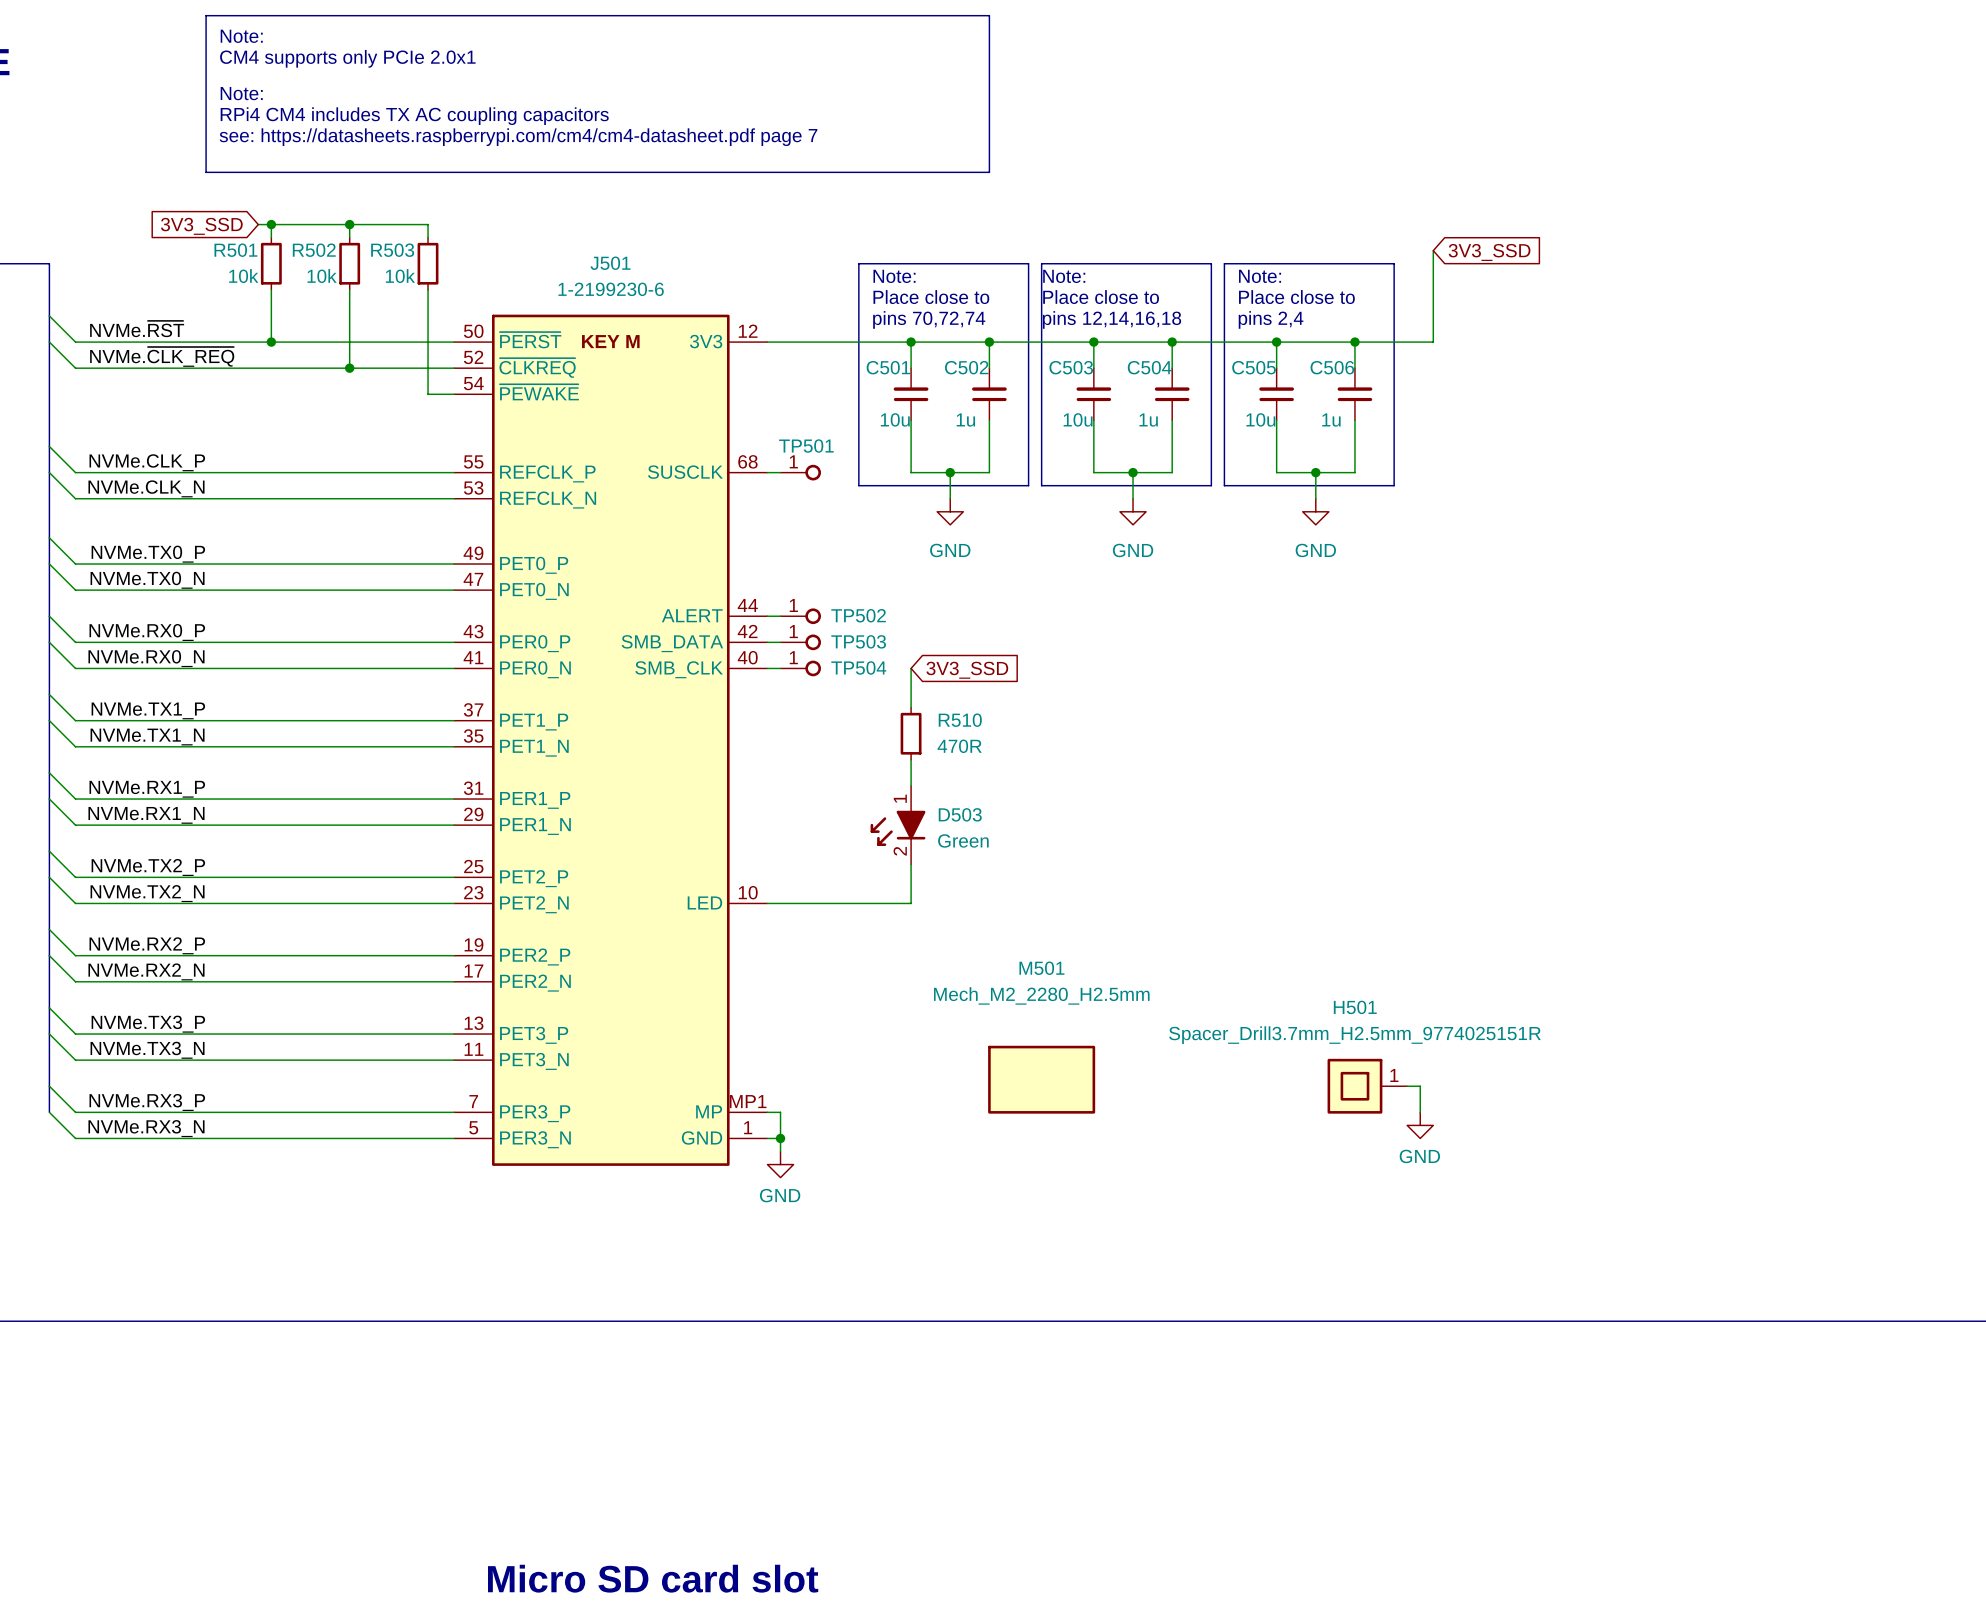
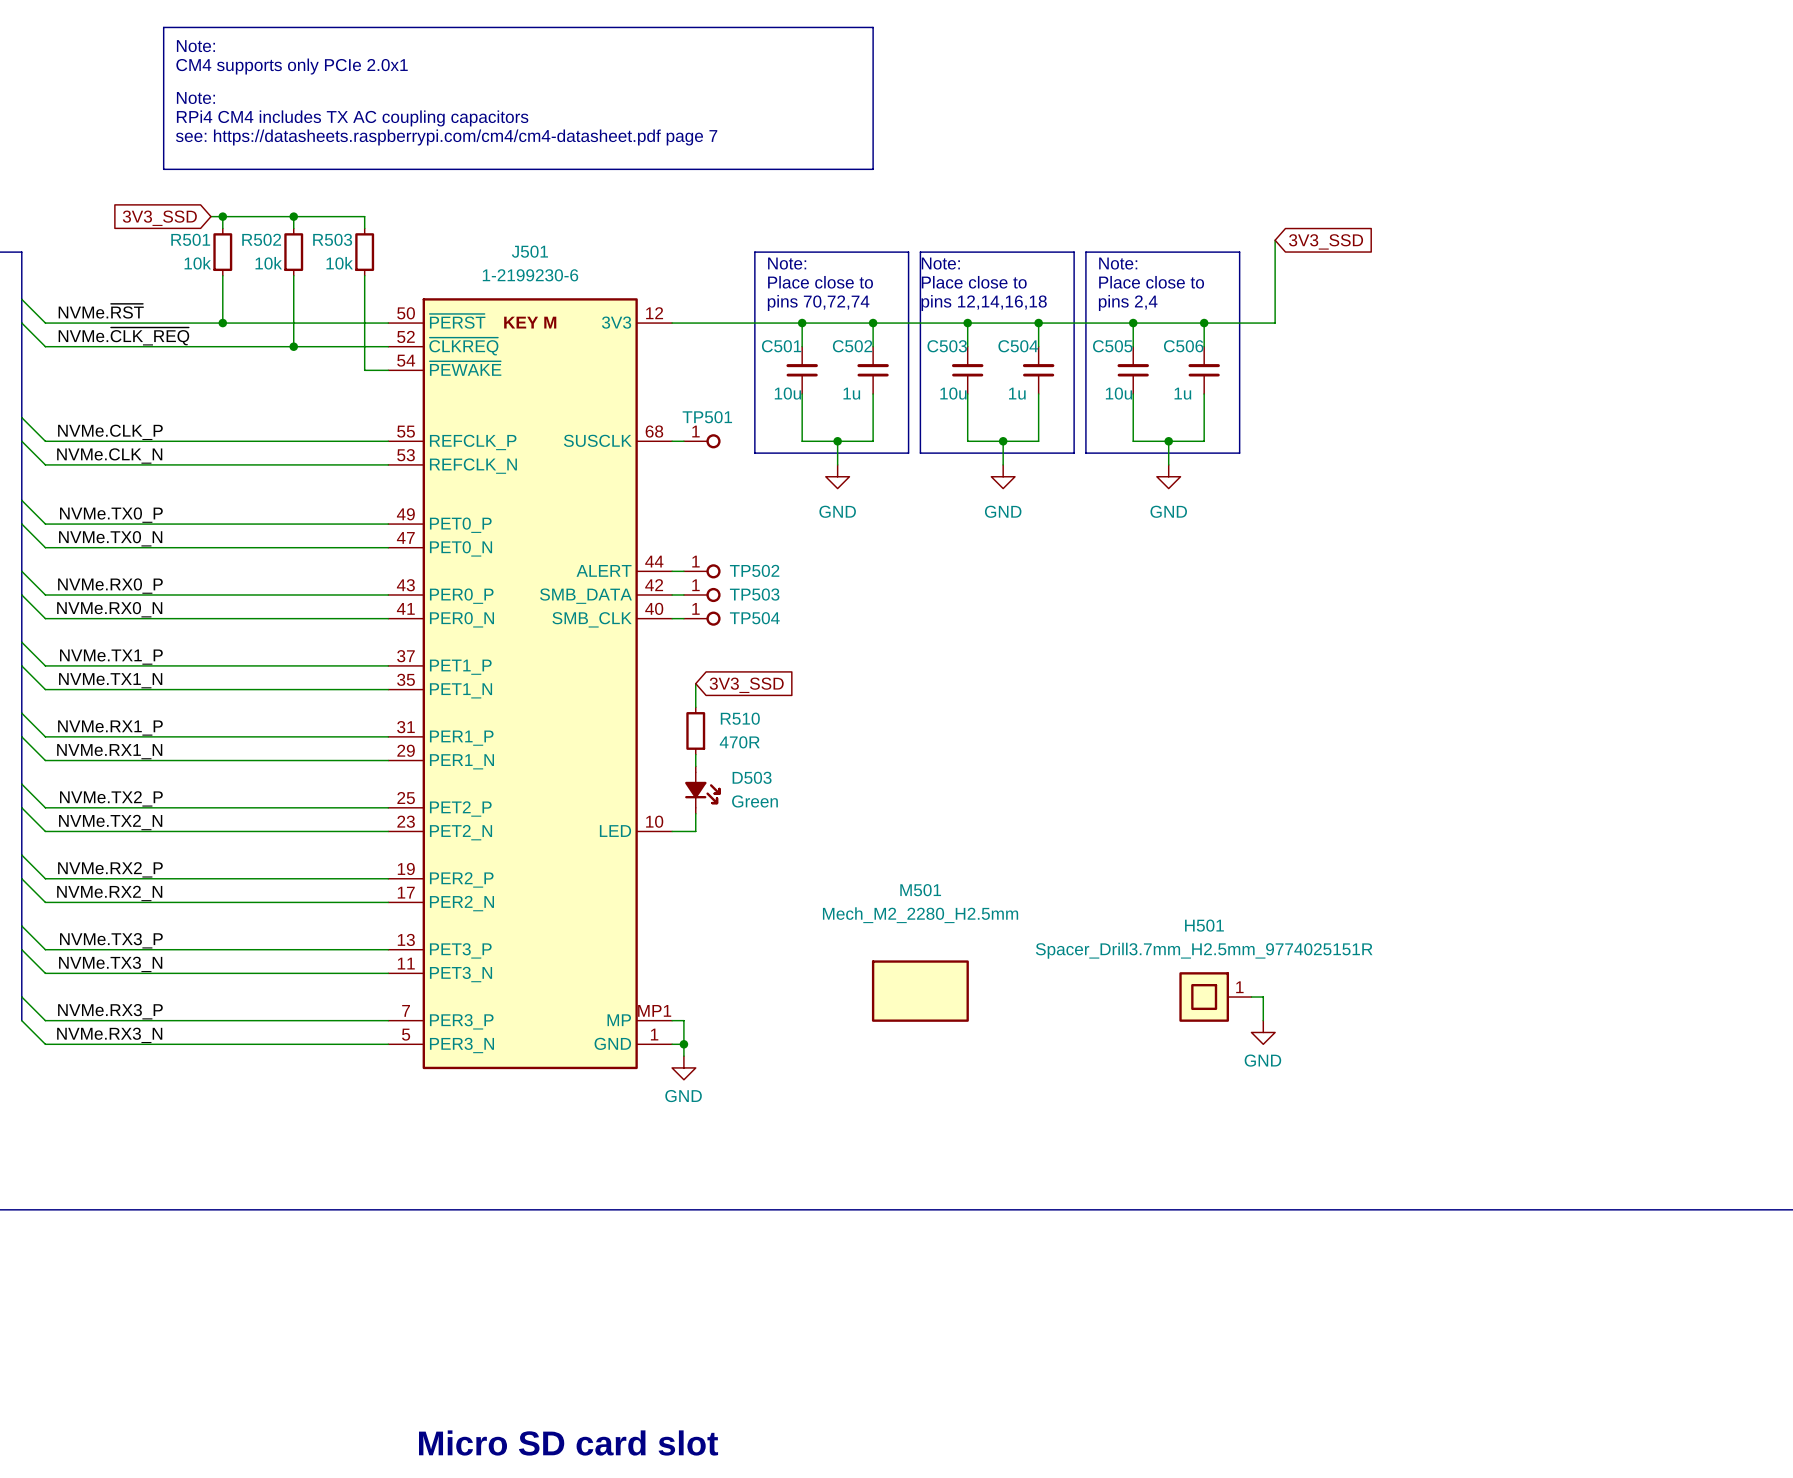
wire: (911, 668) (911, 707) -> none
global label position: 3V3_SSD (967, 670) -> 3V3_SSD (746, 685)
R510 position: (911, 733) -> (695, 730)
wire: (911, 759) (911, 785) -> (695, 683) (695, 707)
D503 symbol: [870, 785, 926, 865] -> [685, 766, 721, 814]
wire: none -> (695, 754) (695, 766)
wire: (911, 864) (911, 903) (793, 903) -> (695, 813) (695, 831)

